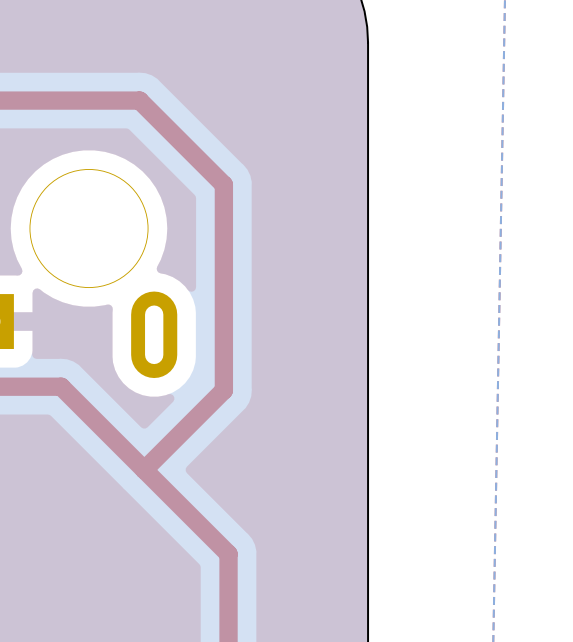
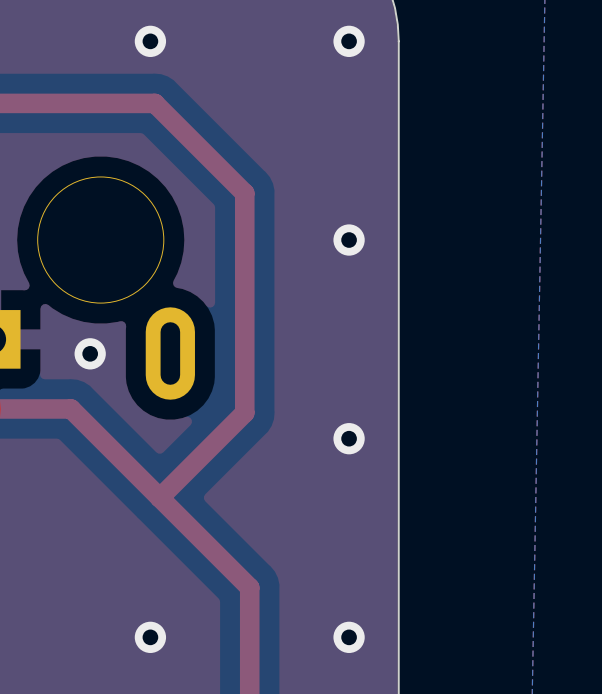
via: none -> (150, 41)
via: none -> (349, 41)
via: none -> (349, 240)
via: none -> (90, 353)
via: none -> (349, 438)
via: none -> (150, 637)
via: none -> (349, 637)

